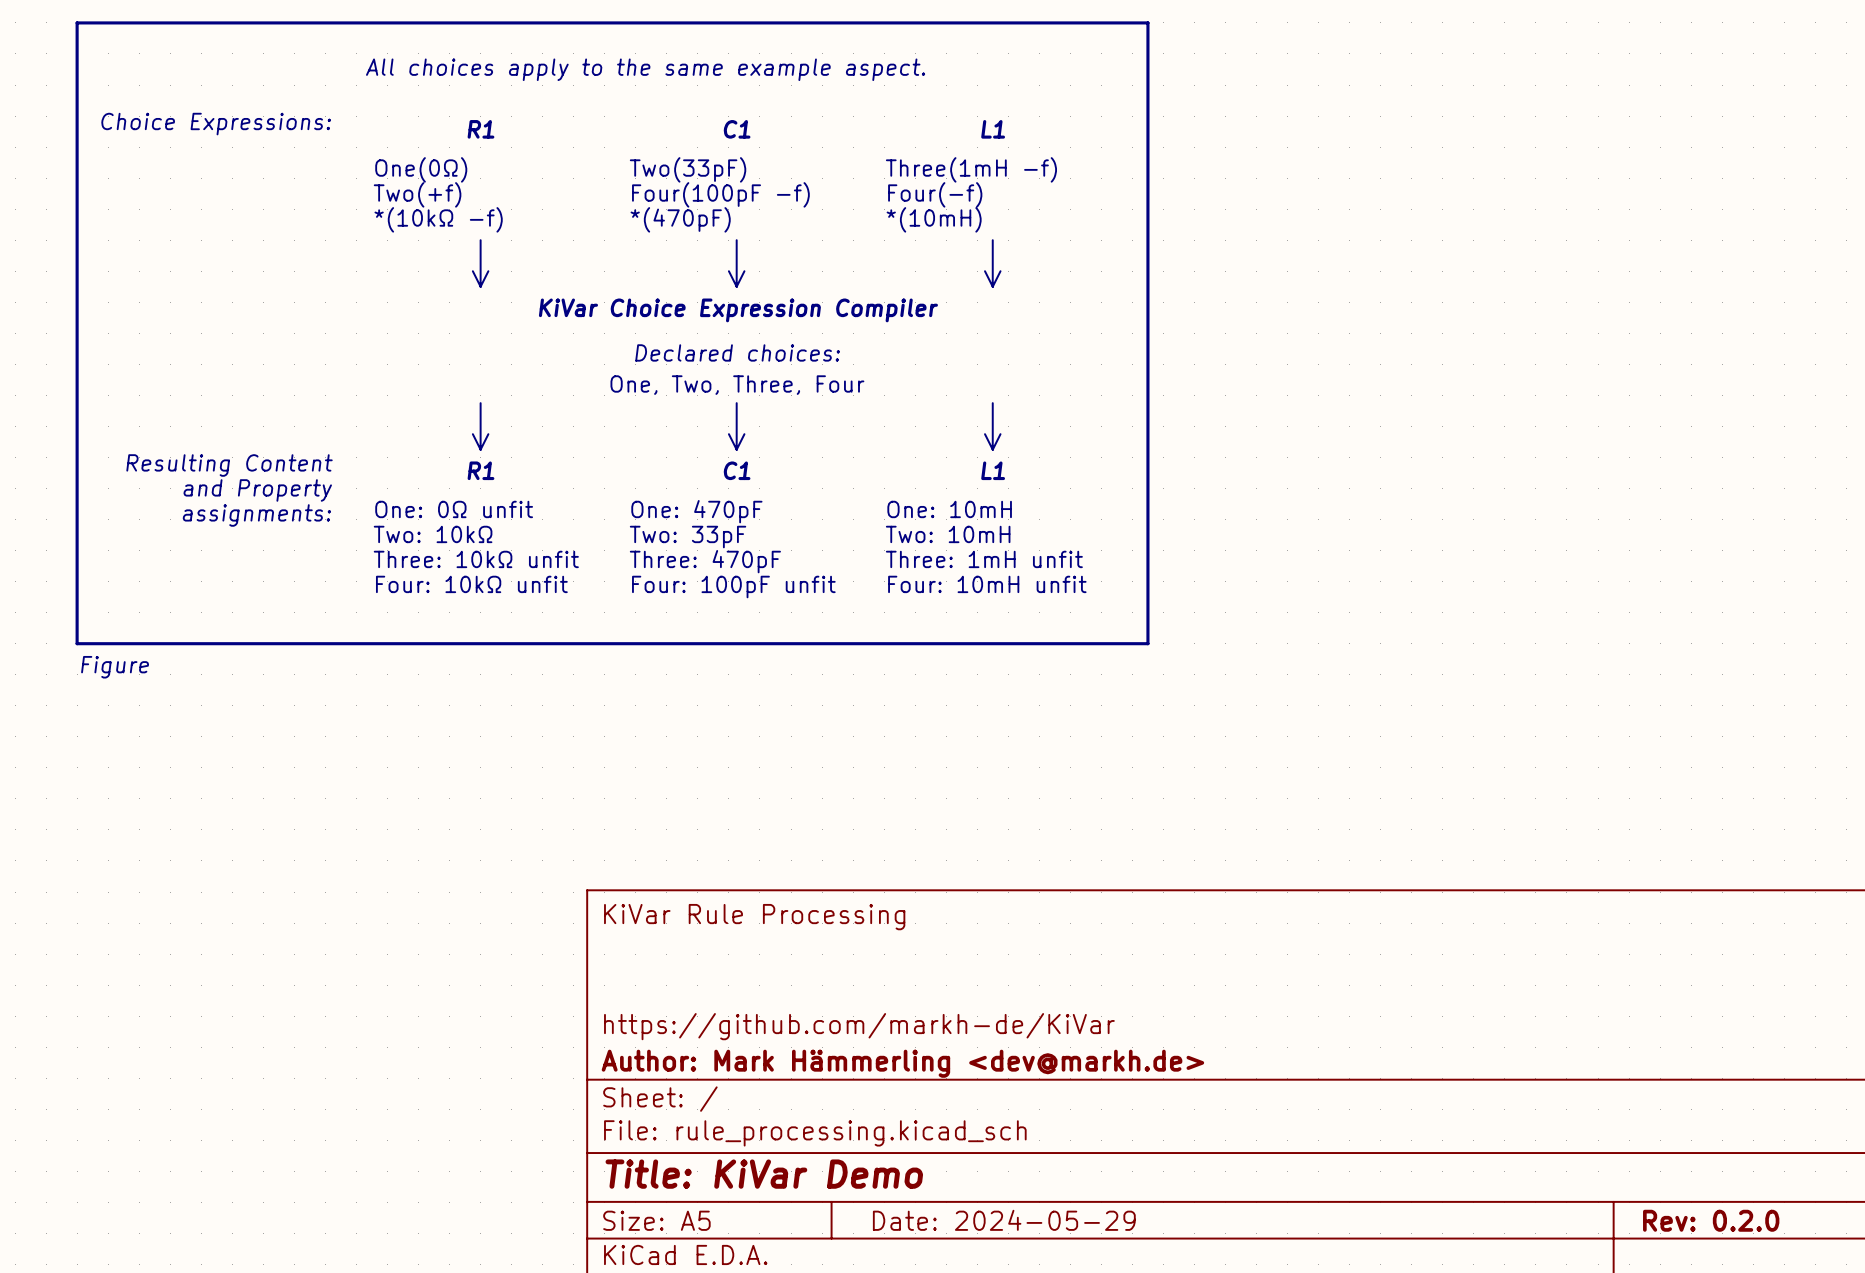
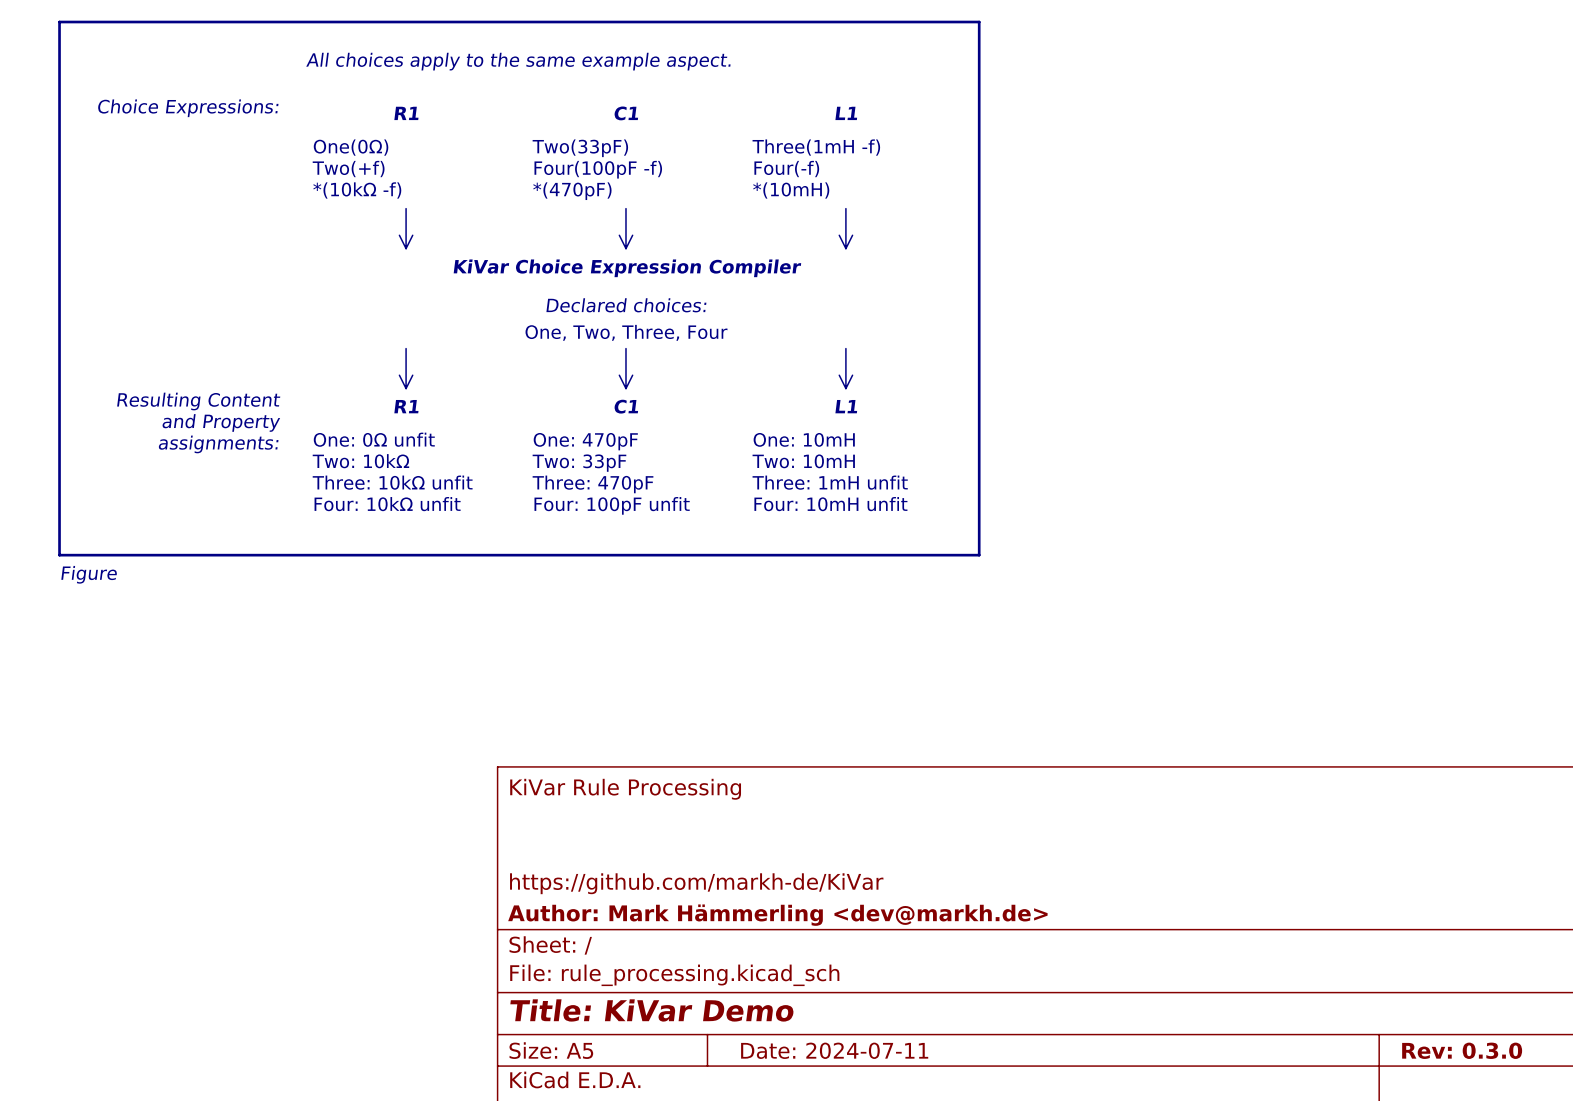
title block: Date: 2024-05-29 (1004, 1220) -> Date: 2024-07-11 (834, 1050)
title block: Rev: 0.2.0 (1711, 1220) -> Rev: 0.3.0 (1462, 1050)

